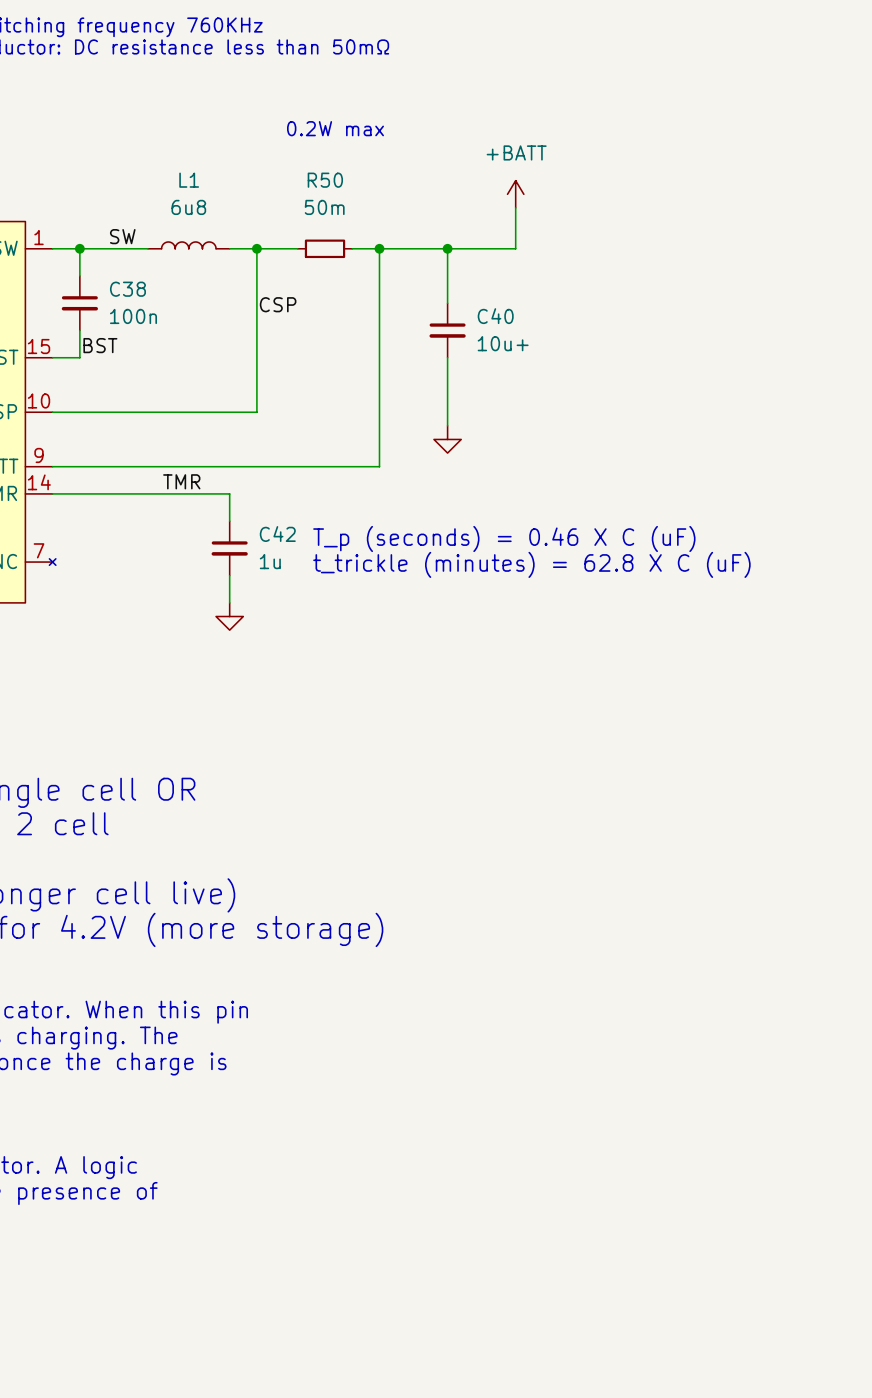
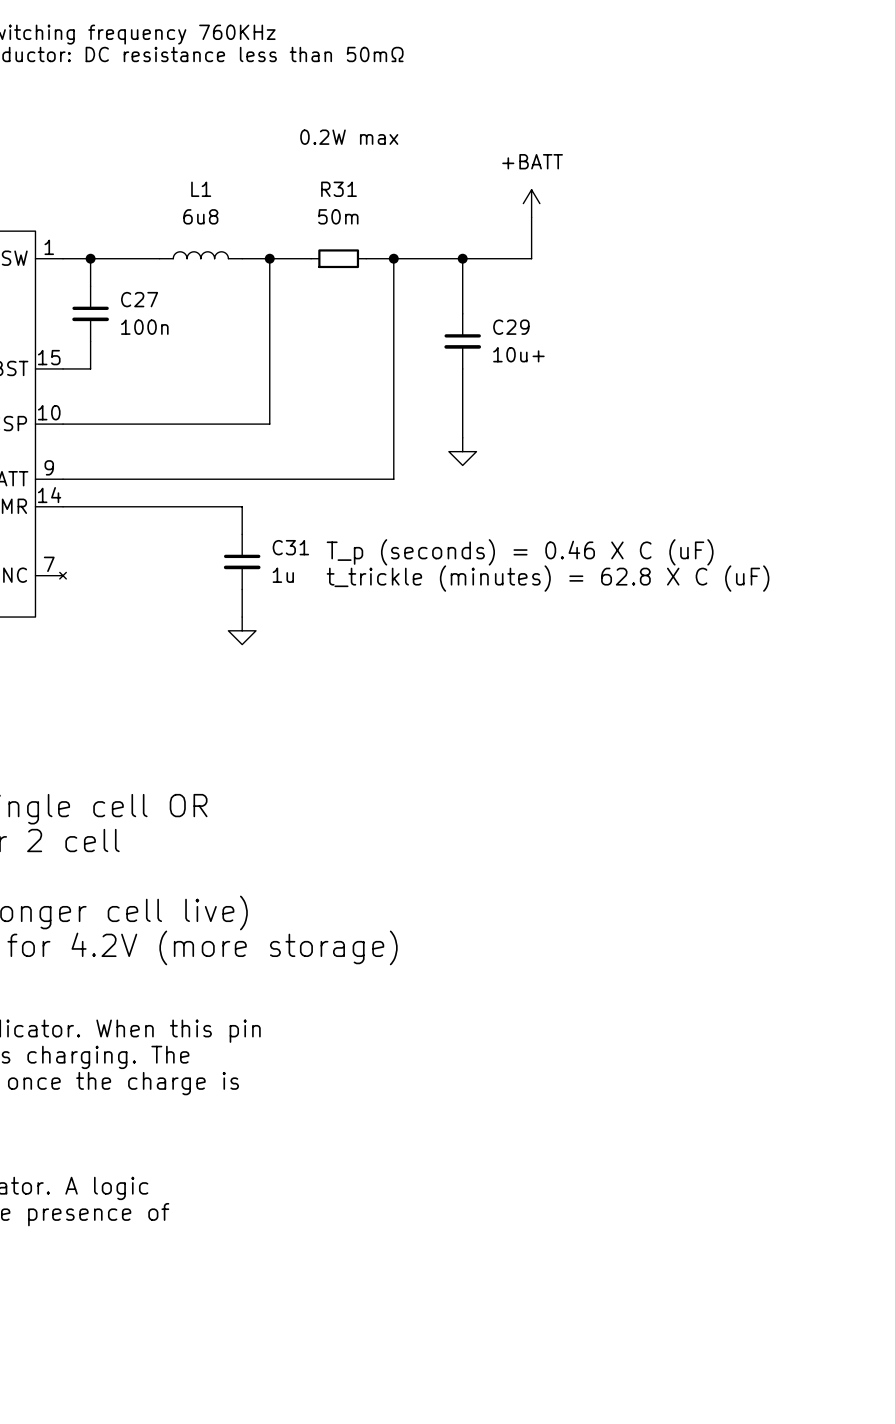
R50 name: R50 (325, 180) -> R31 (338, 189)
label: SW (122, 236) -> none
C38 name: C38 (127, 289) -> C27 (139, 299)
label: CSP (278, 304) -> none
C40 name: C40 (495, 316) -> C29 (511, 327)
label: BST (100, 345) -> none
label: TMR (181, 481) -> none
C42 name: C42 (277, 534) -> C31 (290, 547)

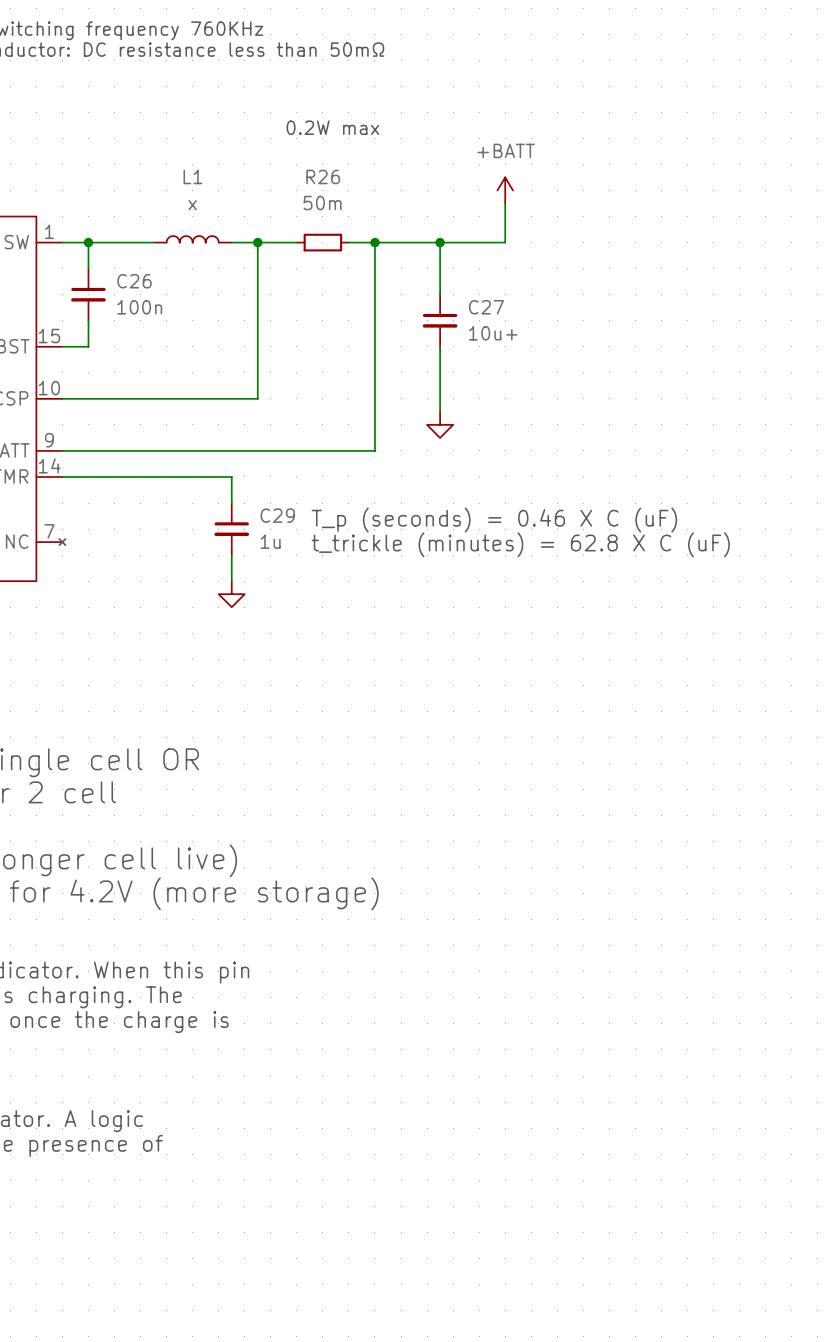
R31 name: R31 (338, 189) -> R26 (323, 176)
L1 value: 6u8 (200, 216) -> x (192, 205)
C27 name: C27 (139, 299) -> C26 (134, 281)
C29 name: C29 (511, 327) -> C27 (486, 307)
C31 name: C31 (290, 547) -> C29 (277, 515)

